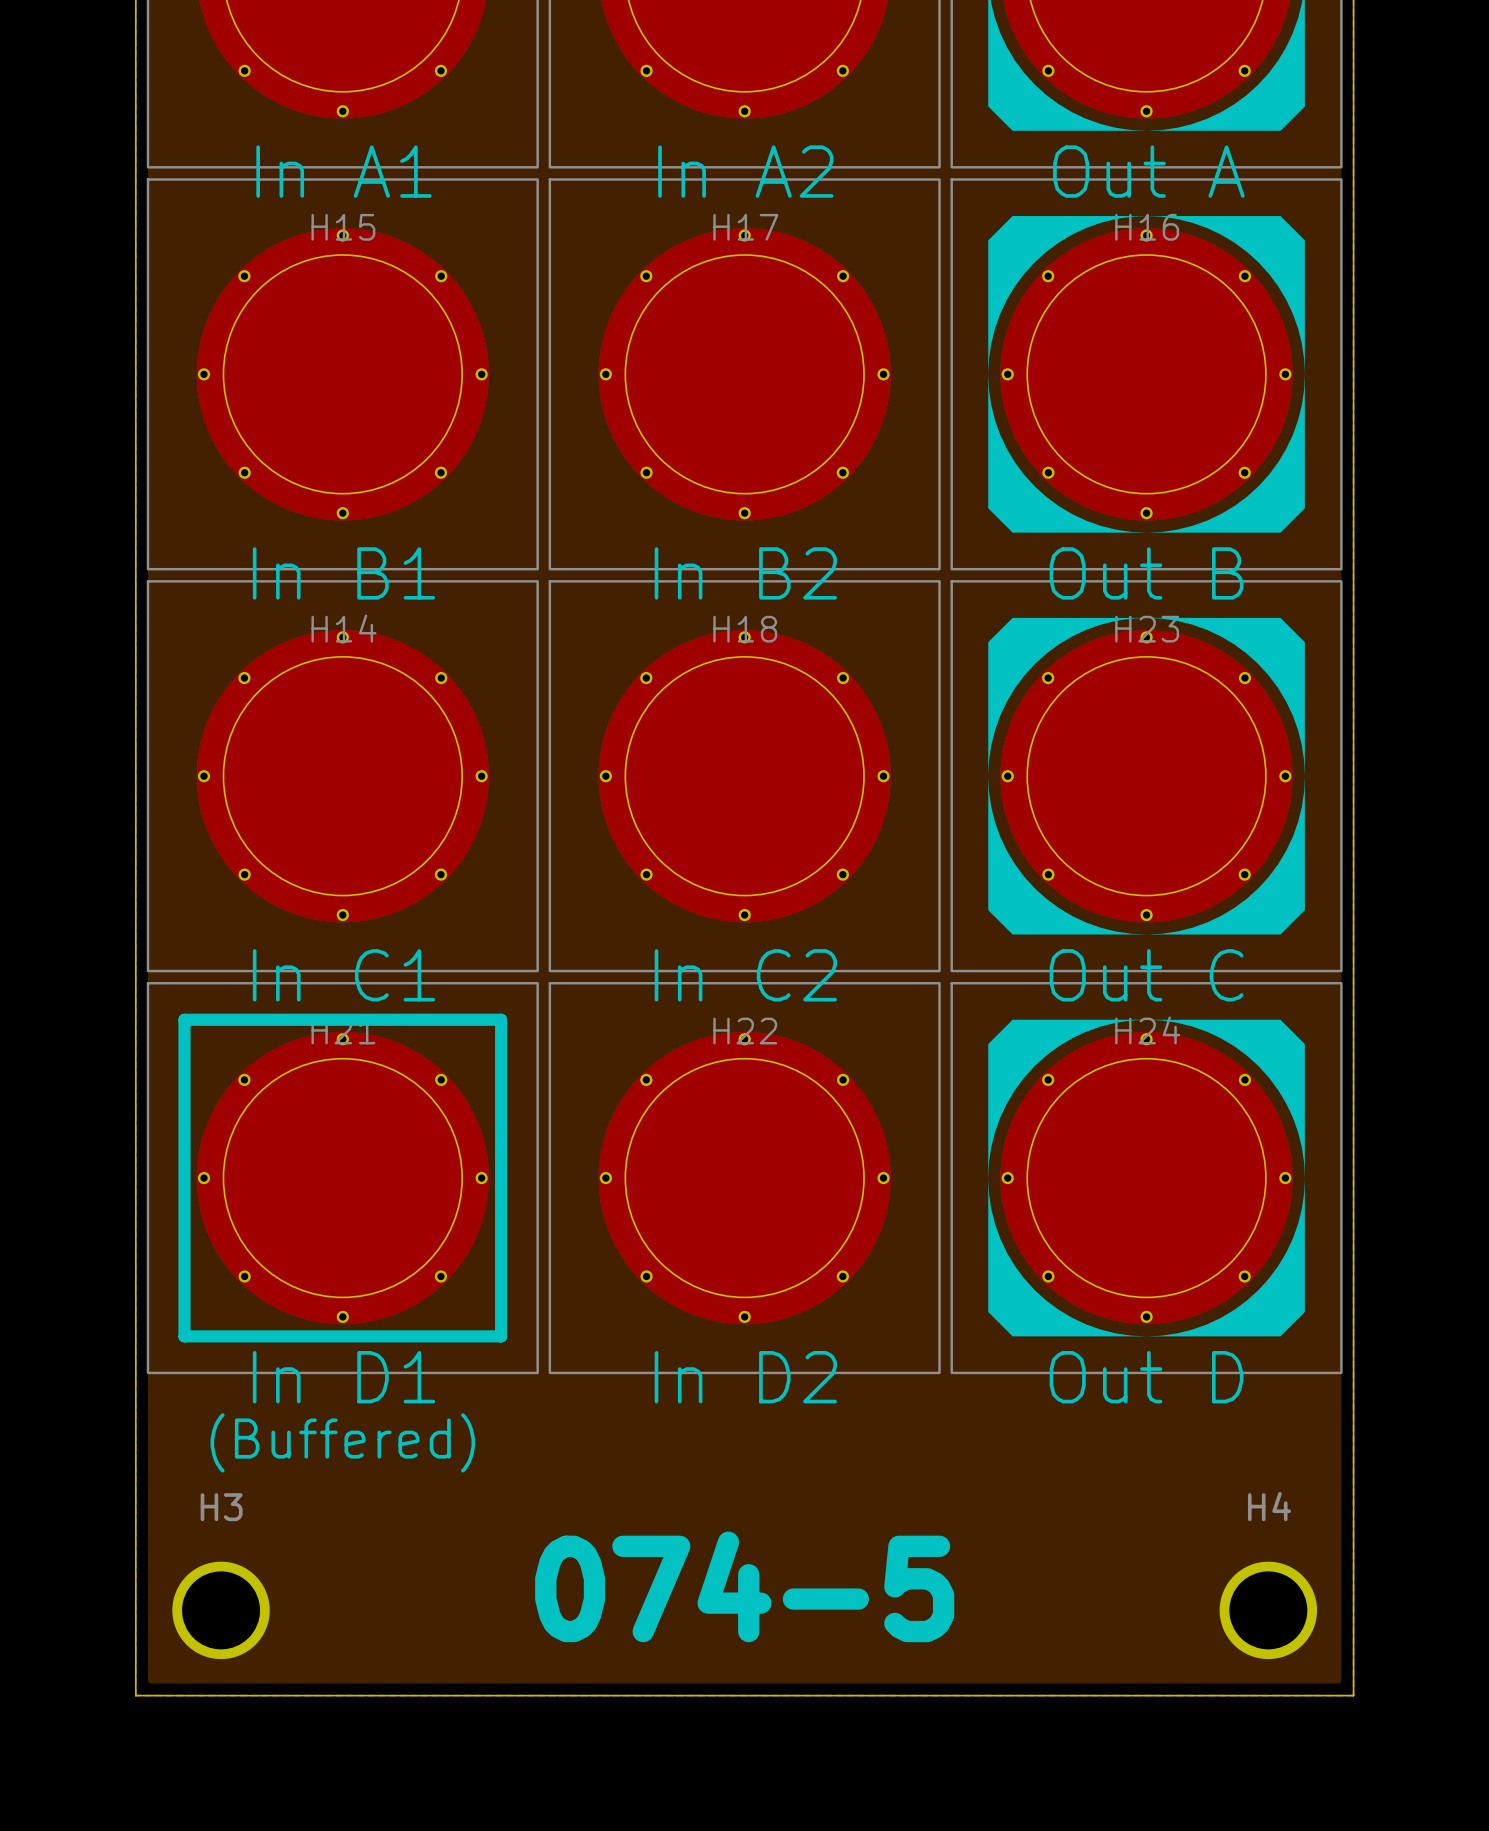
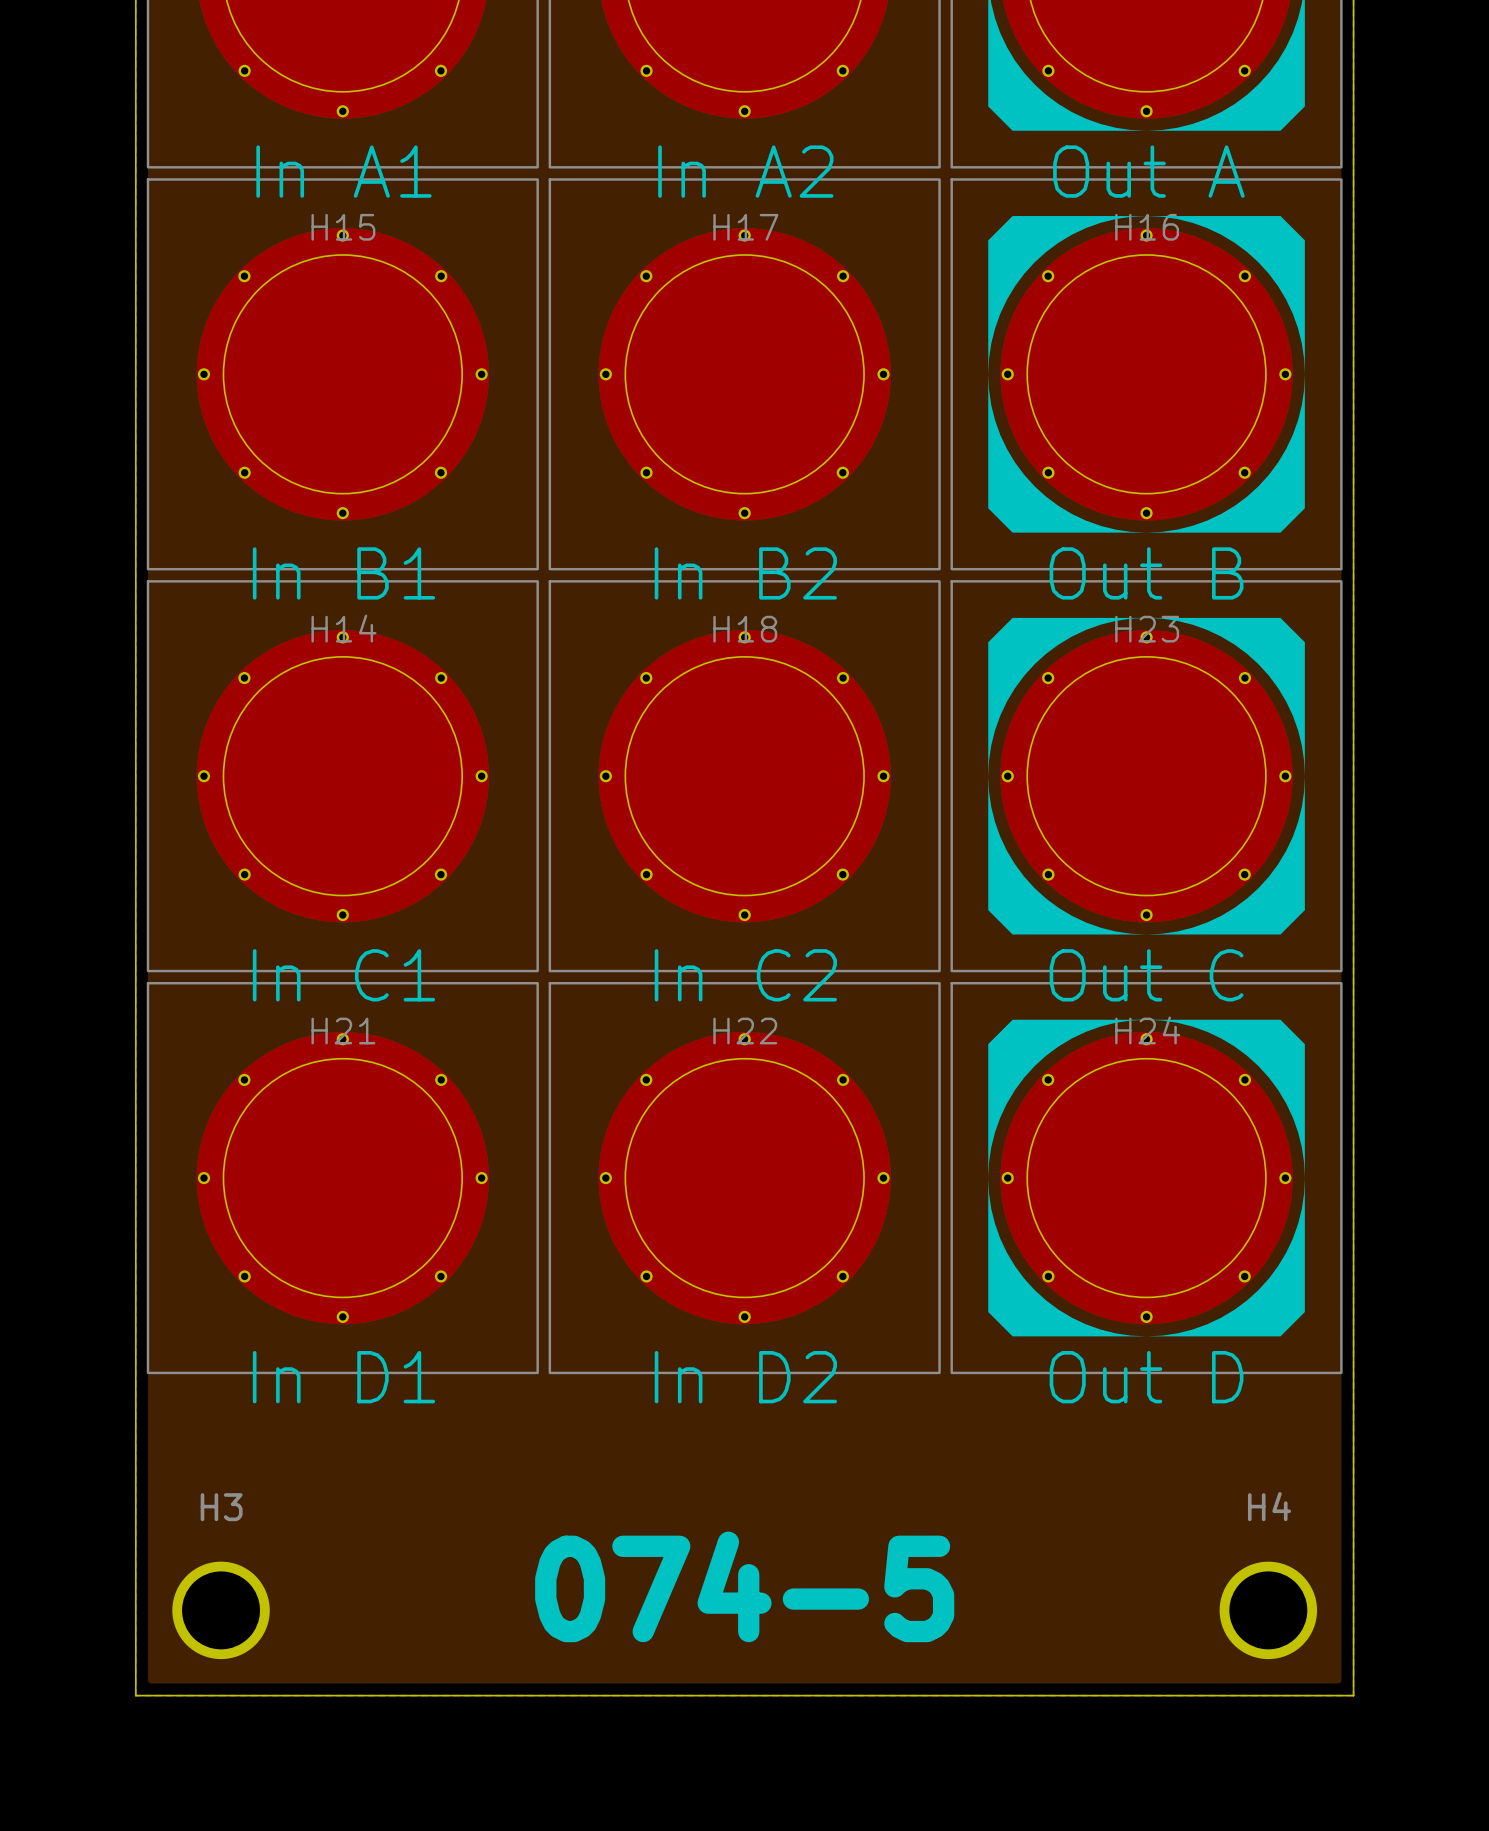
line: (184, 1019) (501, 1019) (501, 1336) (184, 1336) (184, 1019) -> none
text: (Buffered) (342, 1442) -> none

